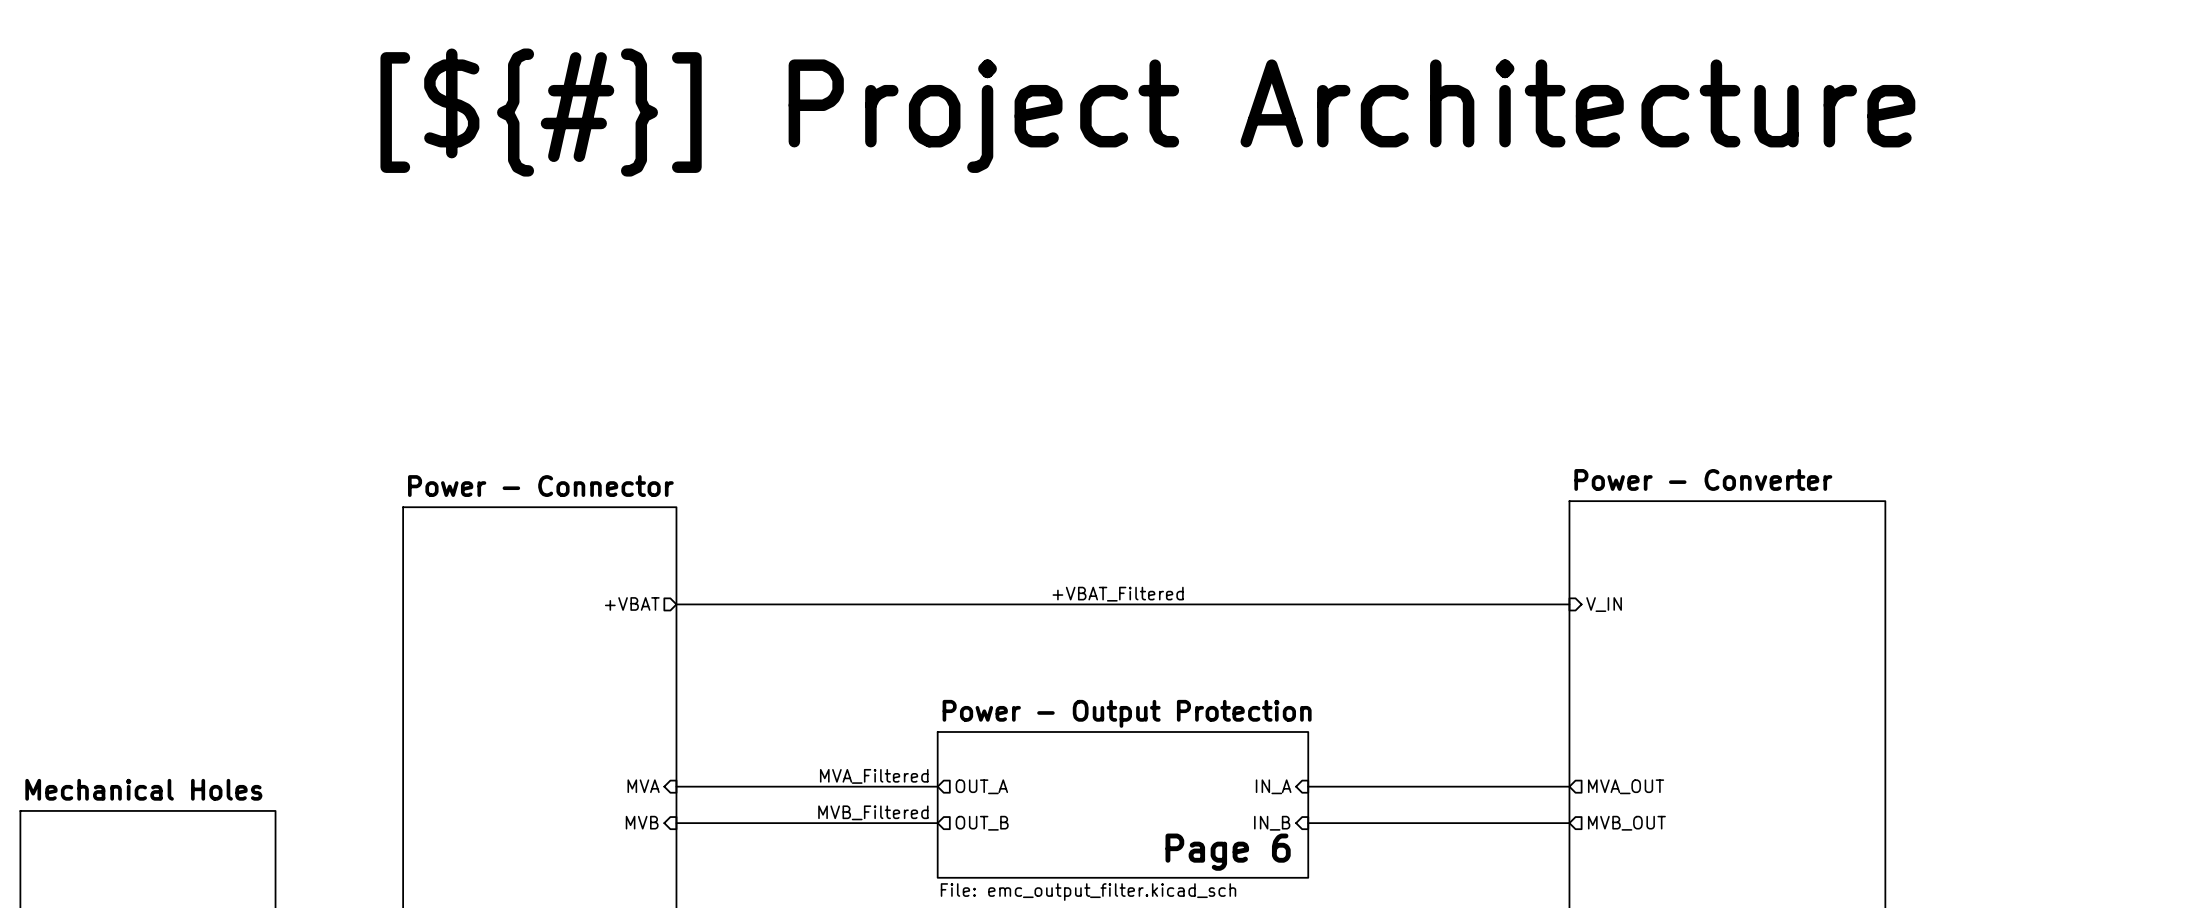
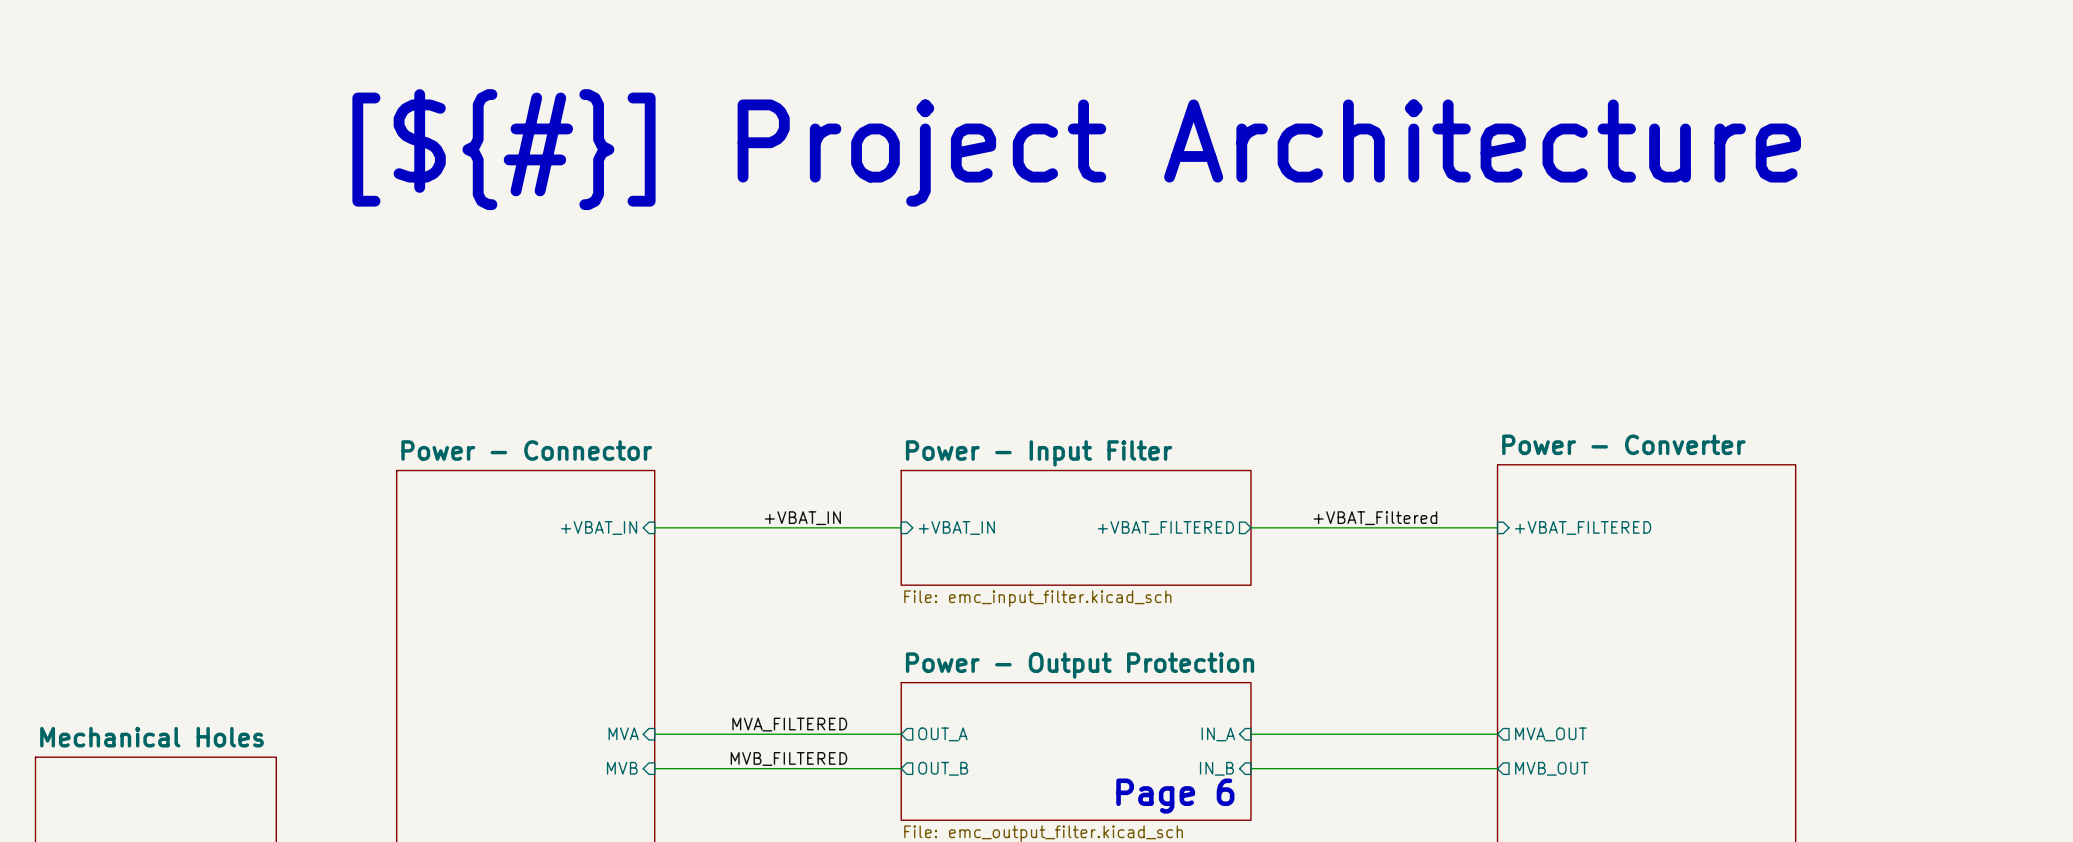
text position: [${#}] Project Architecture (1147, 112) -> [${#}] Project Architecture (1076, 149)
label: none -> +VBAT_IN (802, 518)
label: none -> +VBAT_Filtered (1375, 518)
wire: none -> (654, 527) (901, 527)
sheet Power - Input Filter: none -> File: emc_input_filter.kicad_sch (1076, 527)
wire: none -> (1250, 527) (1497, 527)
sheet pin: none -> +VBAT_IN (599, 527)
sheet pin: none -> +VBAT_IN (956, 527)
sheet pin: none -> +VBAT_FILTERED (1165, 527)
sheet pin: none -> +VBAT_FILTERED (1583, 527)
label: +VBAT_Filtered (1118, 594) -> none
sheet pin: +VBAT (632, 603) -> none
wire: (676, 604) (1569, 604) -> none
sheet pin: V_IN (1604, 604) -> none
label: none -> MVA_FILTERED (789, 724)
label: MVA_Filtered (874, 776) -> none
label: none -> MVB_FILTERED (788, 758)
label: MVB_Filtered (873, 812) -> none

